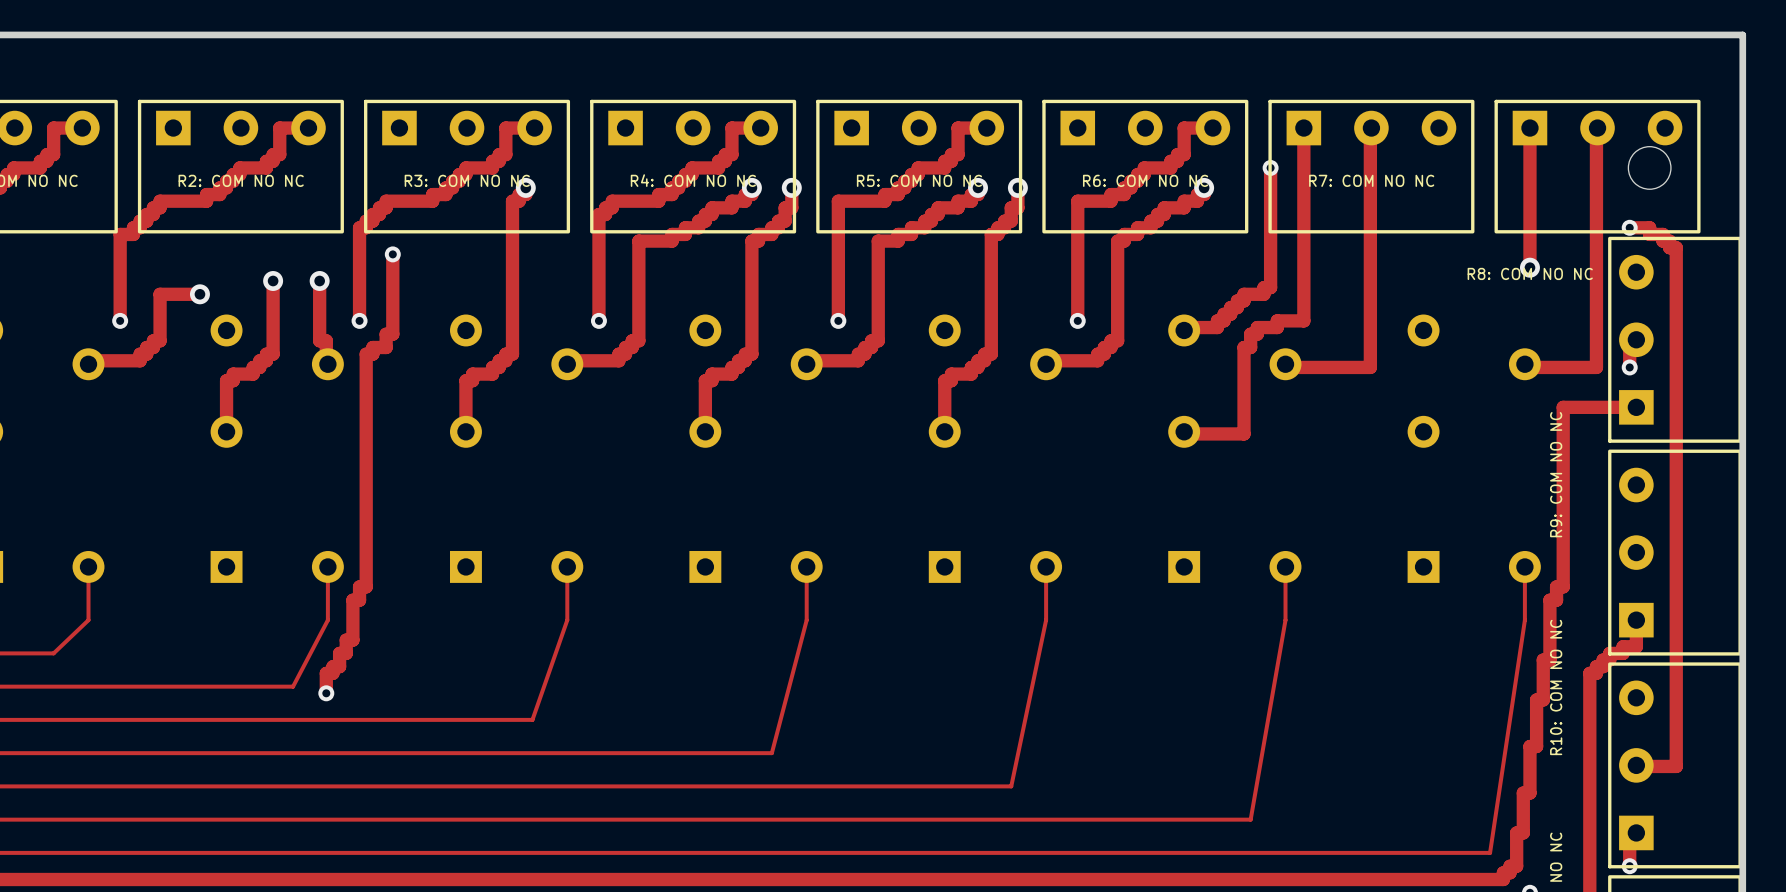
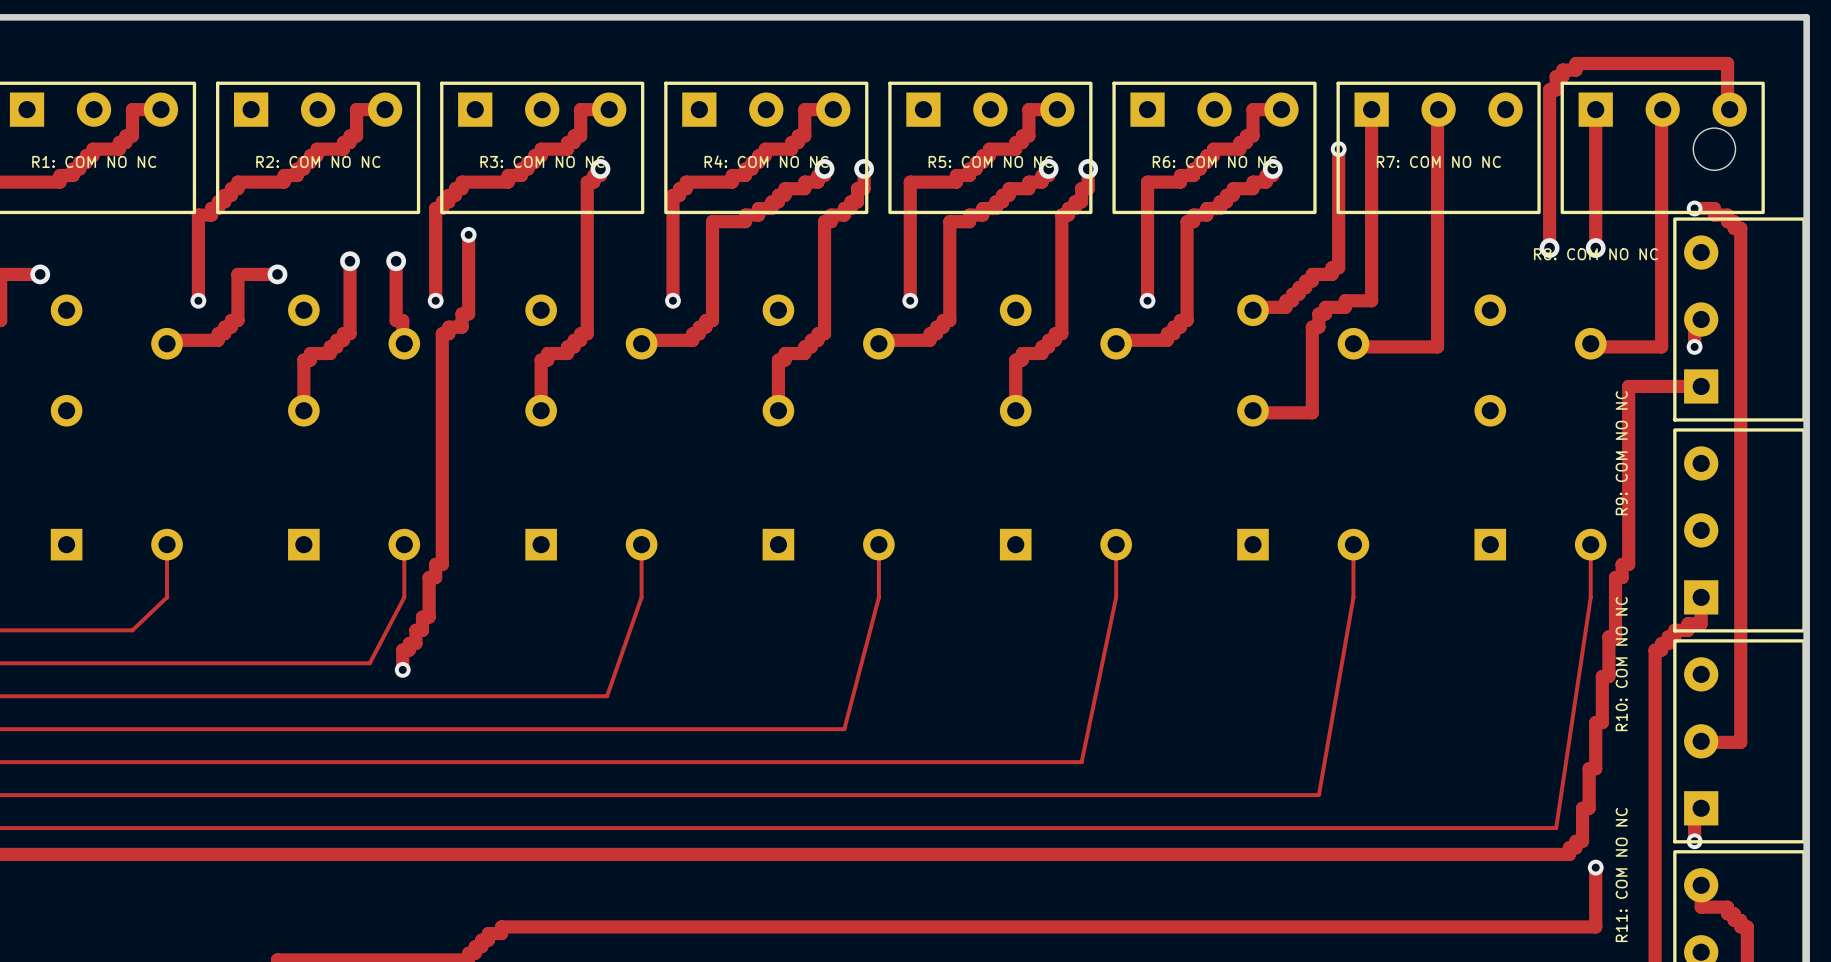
track: none -> (1727, 103) (1727, 63) (1575, 63) (1575, 70) (1562, 70) (1562, 76) (1556, 76) (1556, 89) (1549, 89) (1549, 248)
via: none -> (1549, 248)

